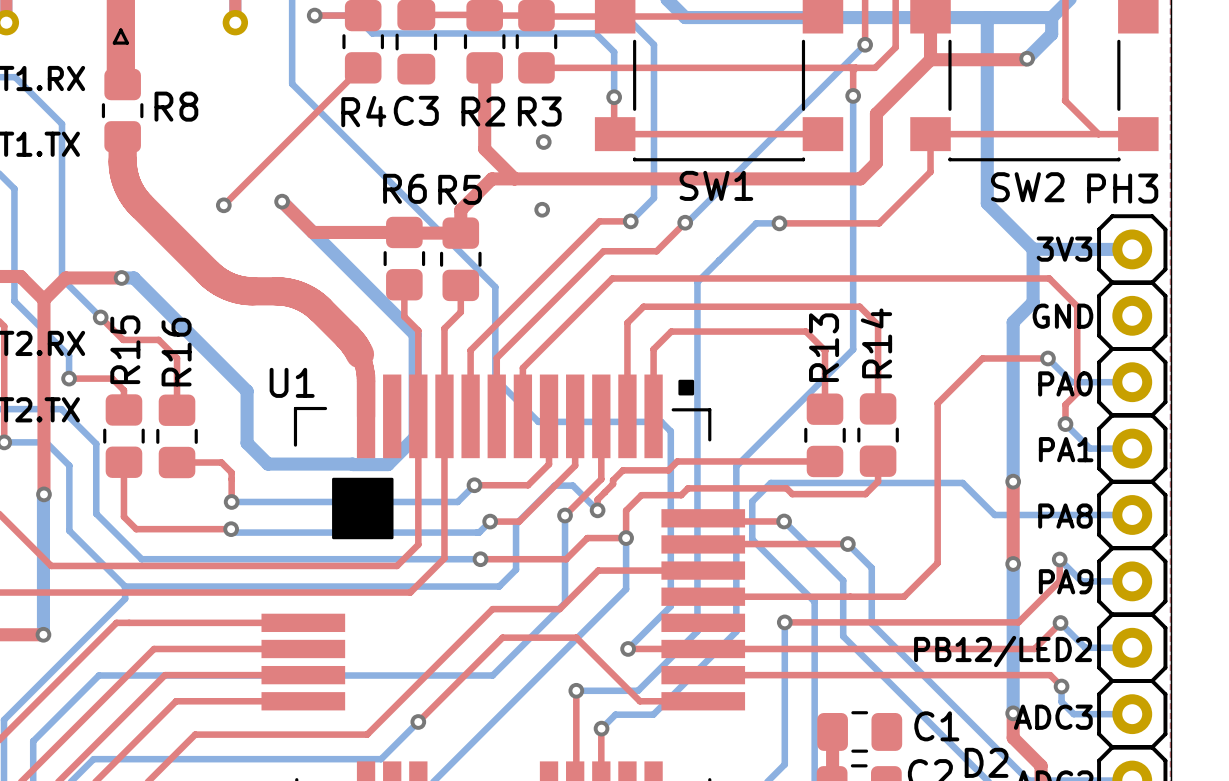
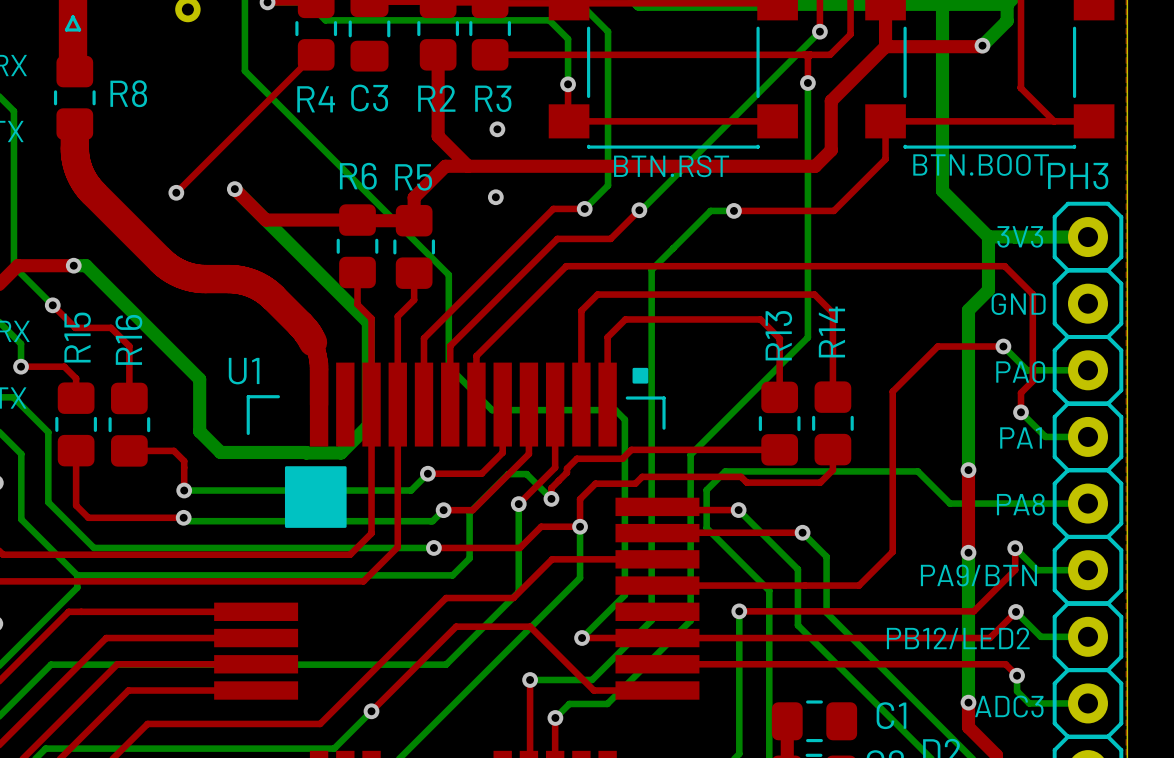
text: none -> BTN.BOOT (981, 164)
text: none -> BTN.RST (671, 166)
SW1 name: SW1 (716, 185) -> none
SW2 name: SW2 (1027, 187) -> none
text: PA9 (1066, 581) -> none
text: none -> PA9/BTN (978, 575)

